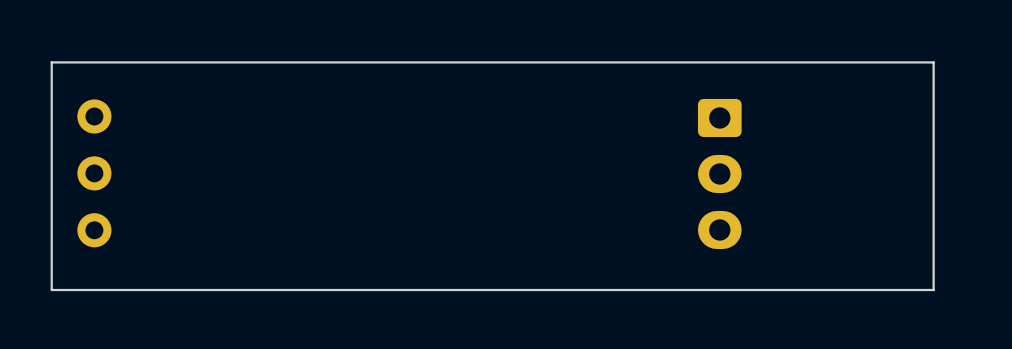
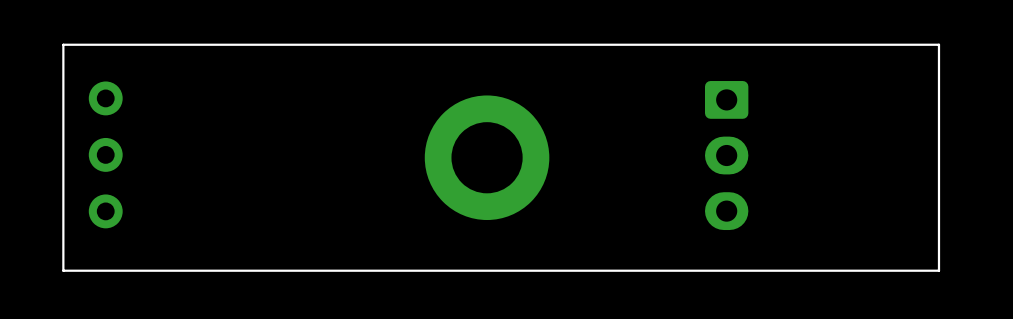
part: none -> (487, 157)

